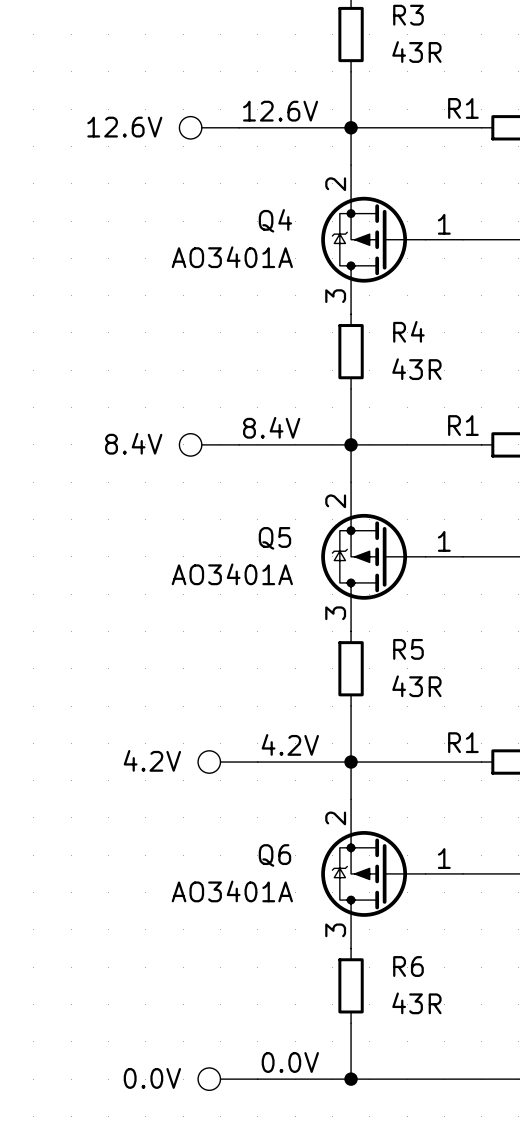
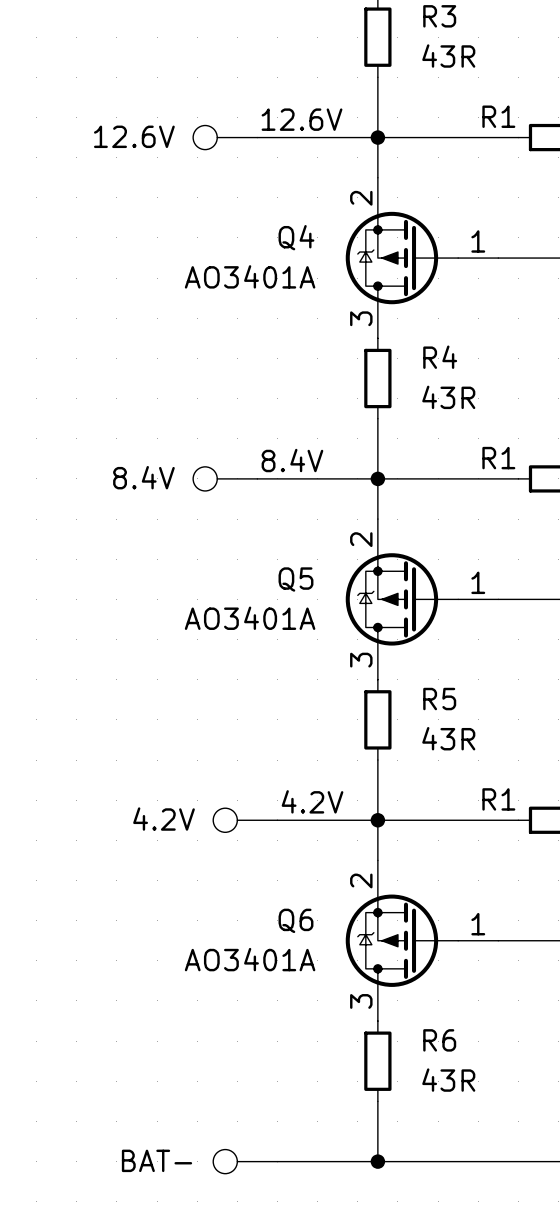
label: 0.0V (290, 1062) -> none
part value: 0.0V (152, 1078) -> BAT- (157, 1160)

